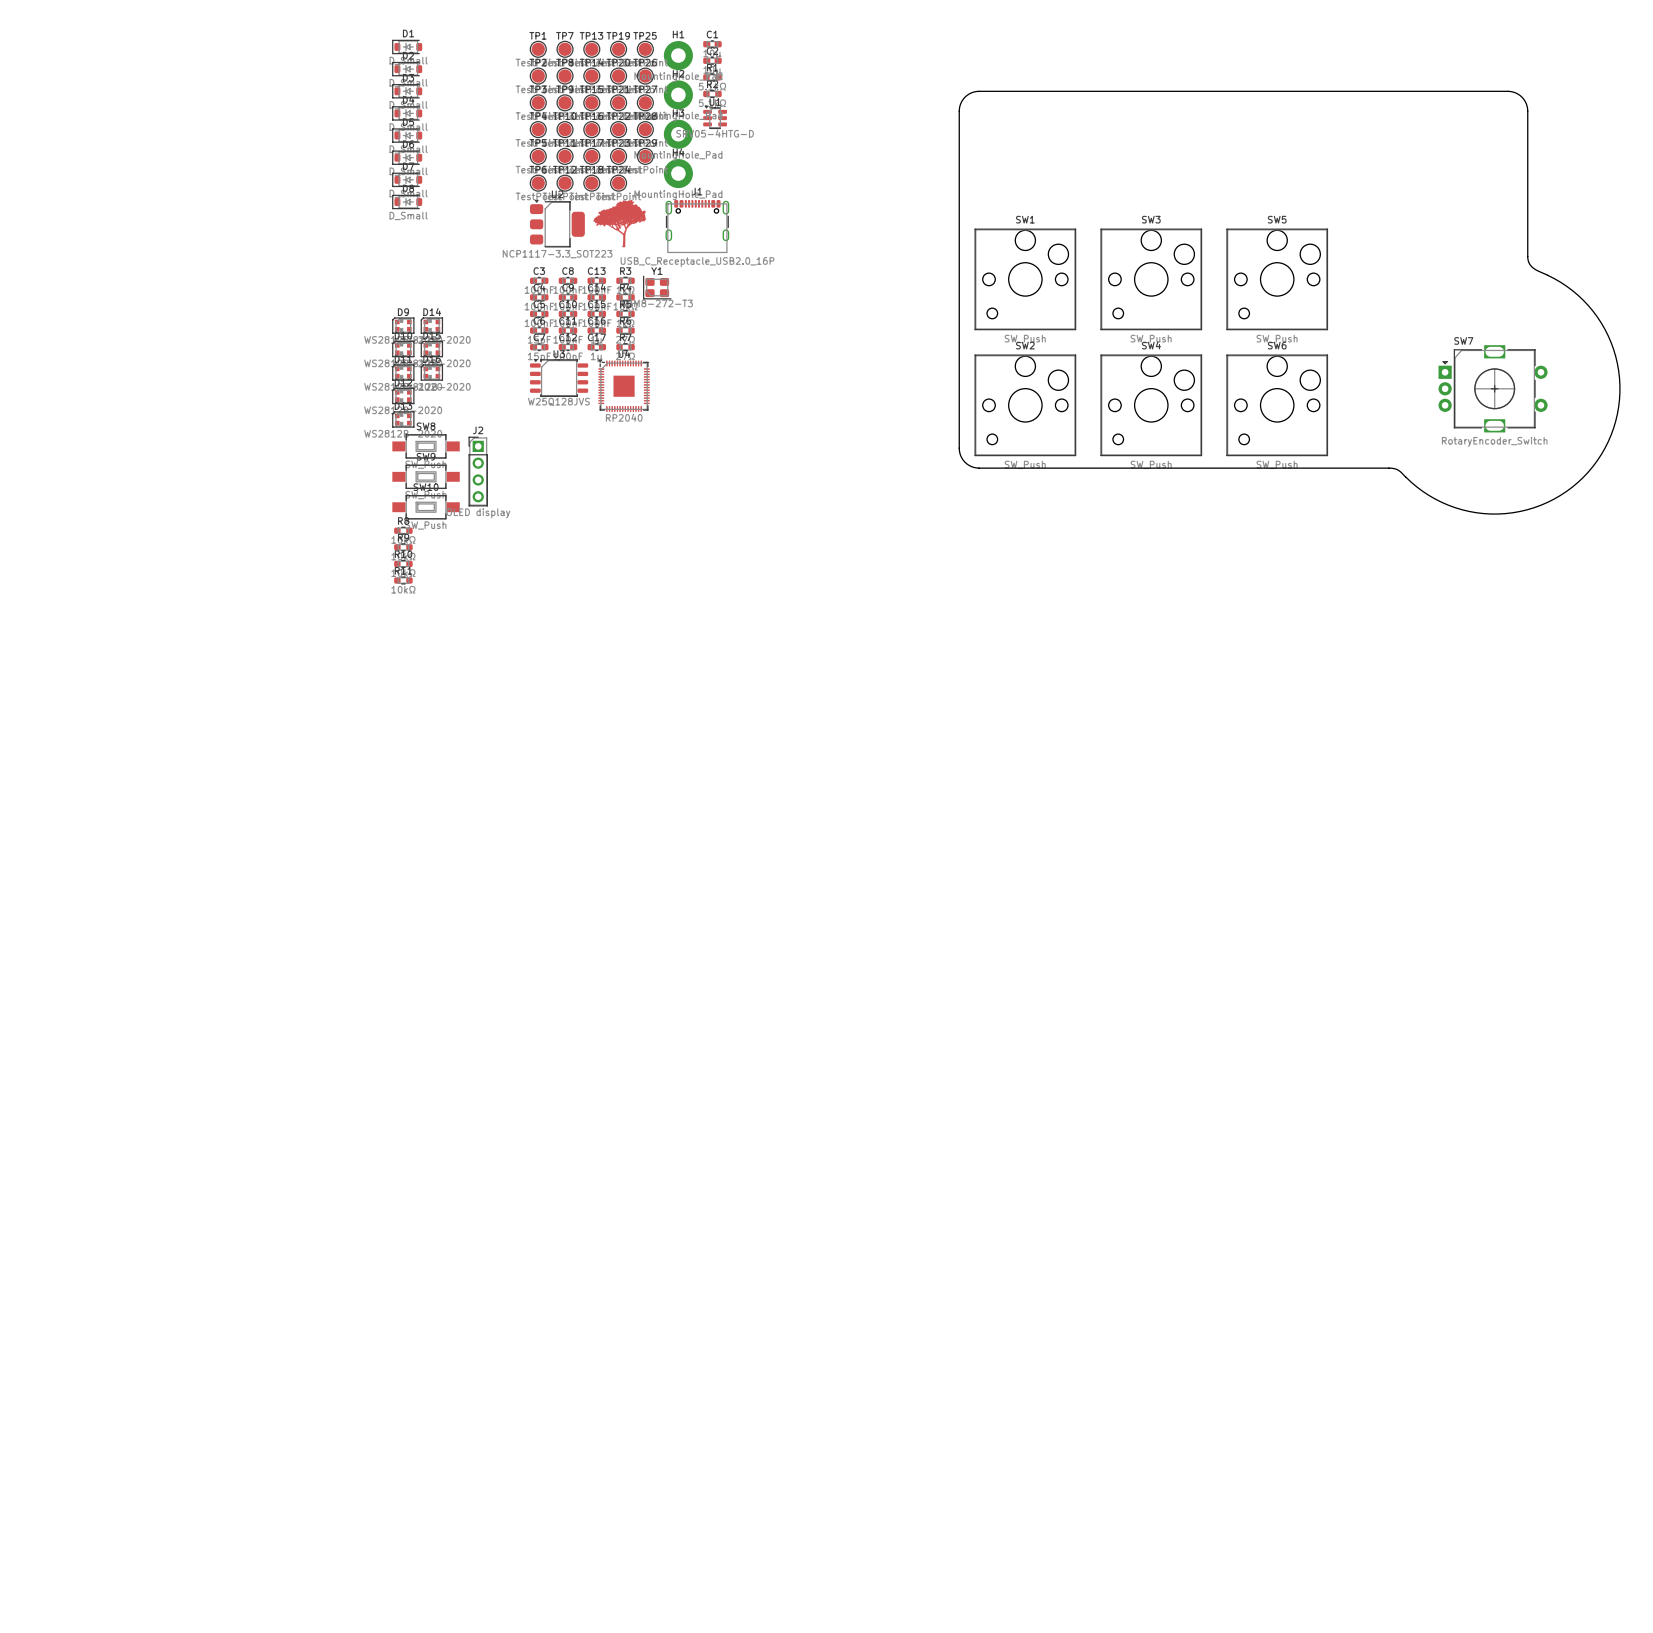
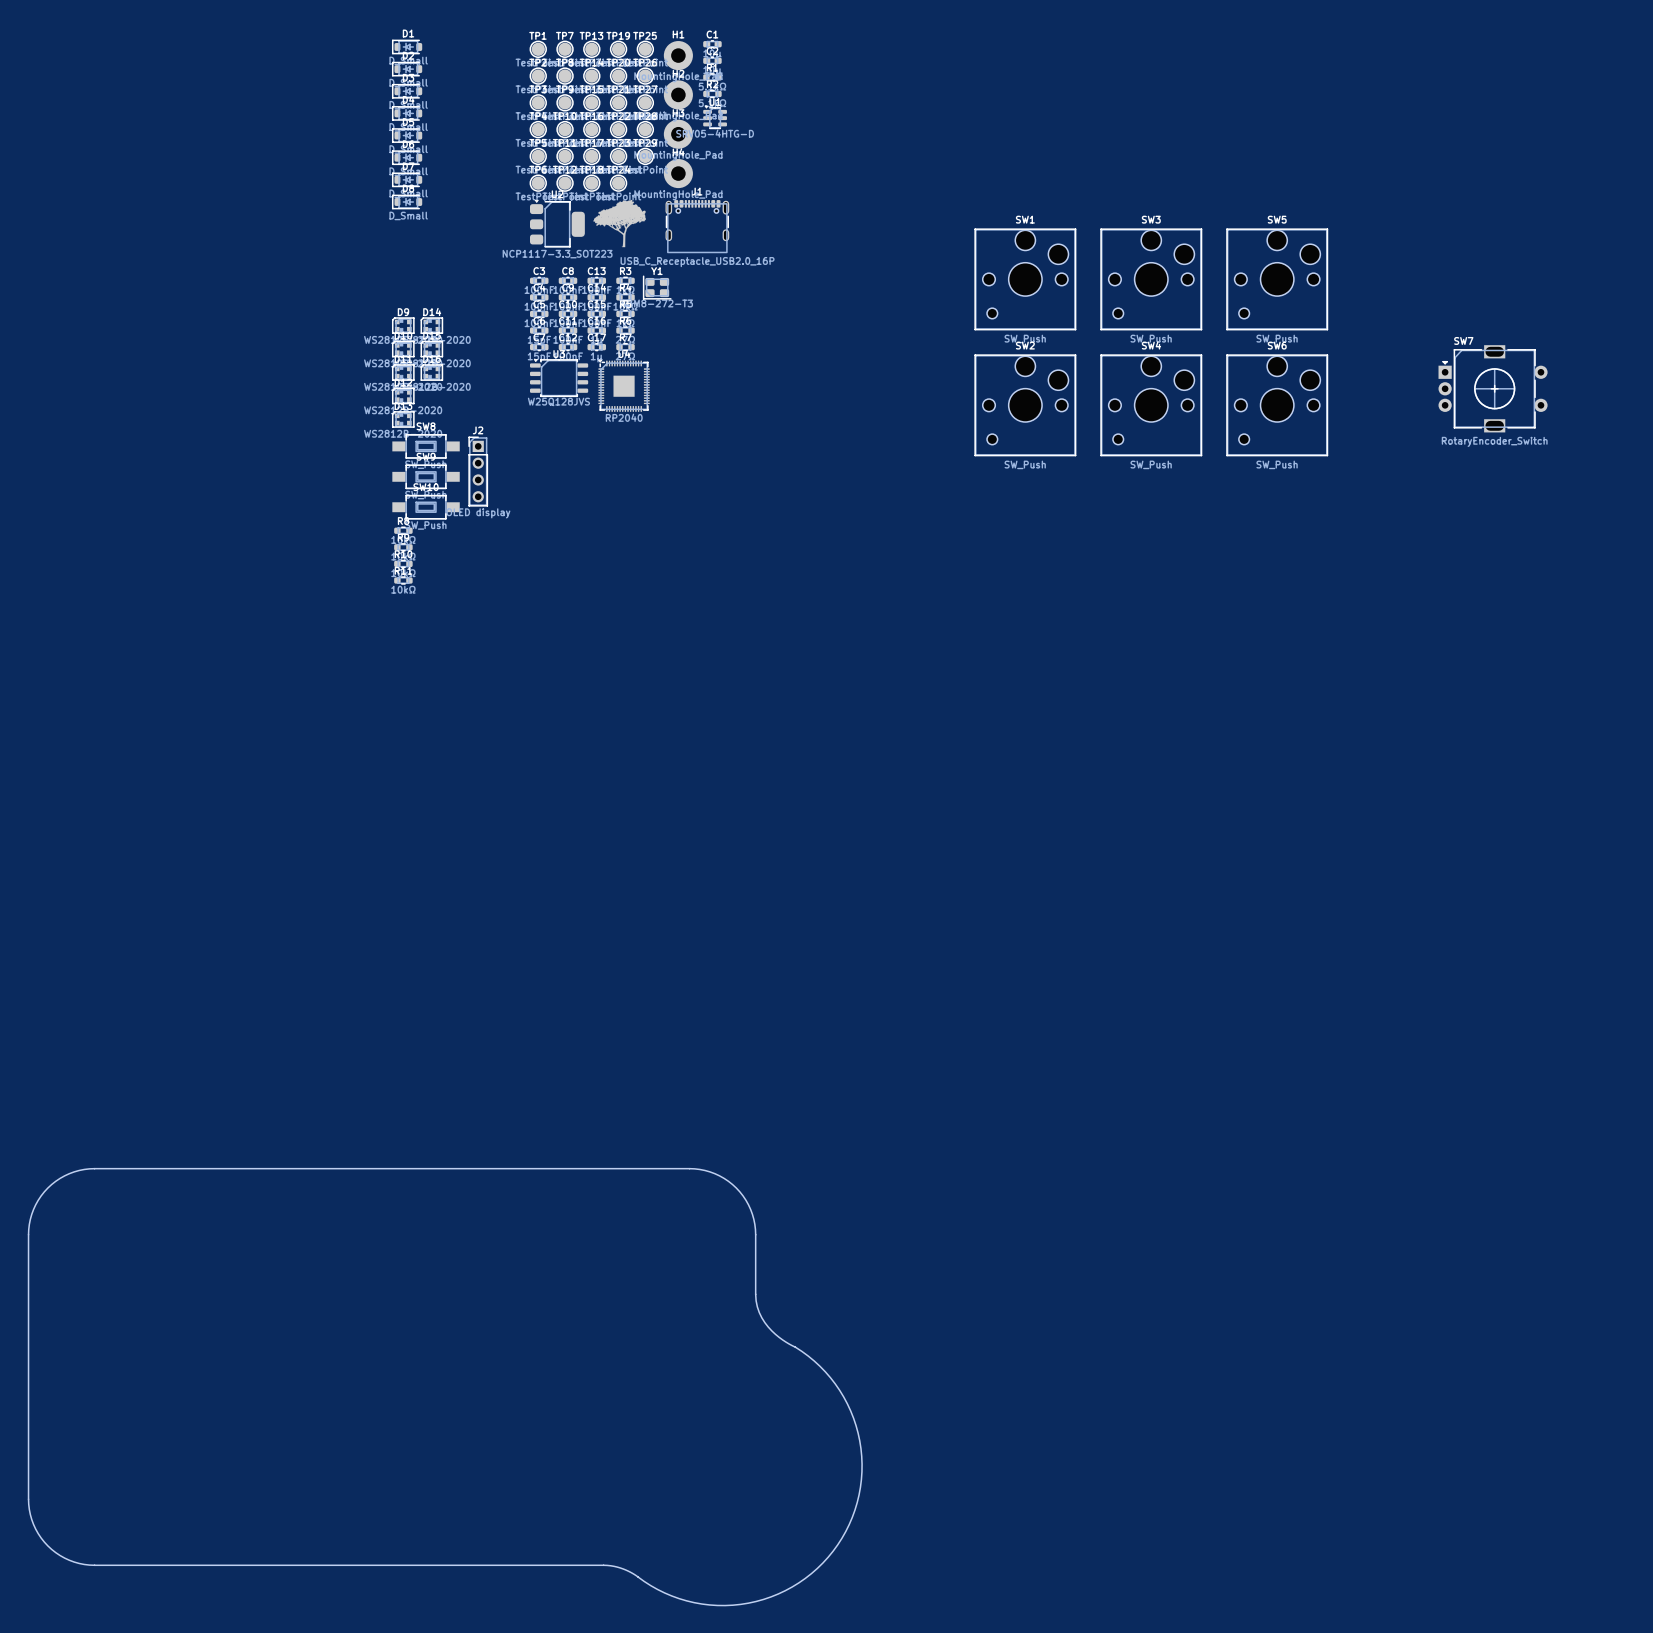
board edge: (979, 91) (1507, 91) (1517, 93) (1525, 101) (1527, 111) (1528, 262) (1534, 269) (1566, 286) (1588, 305) (1604, 329) (1615, 356) (1619, 377) (1619, 399) (1615, 421) (1604, 448) (1583, 477) (1560, 495) (1534, 507) (1498, 514) (1469, 511) (1448, 505) (1422, 491) (1398, 470) (1390, 468) (979, 468) (969, 465) (961, 458) (959, 448) (959, 111) (960, 103) (965, 97) (971, 92) (979, 91) -> none
board edge: none -> (94, 1168) (689, 1168) (705, 1170) (719, 1175) (739, 1191) (752, 1214) (755, 1229) (756, 1300) (761, 1317) (775, 1334) (808, 1356) (825, 1371) (839, 1390) (853, 1418) (860, 1448) (861, 1471) (857, 1502) (849, 1524) (828, 1557) (798, 1582) (763, 1599) (725, 1605) (701, 1604) (679, 1598) (657, 1589) (628, 1571) (607, 1565) (94, 1565) (79, 1563) (64, 1558) (47, 1545) (38, 1533) (31, 1519) (28, 1504) (28, 1229) (33, 1209) (47, 1188) (69, 1173) (94, 1168)

